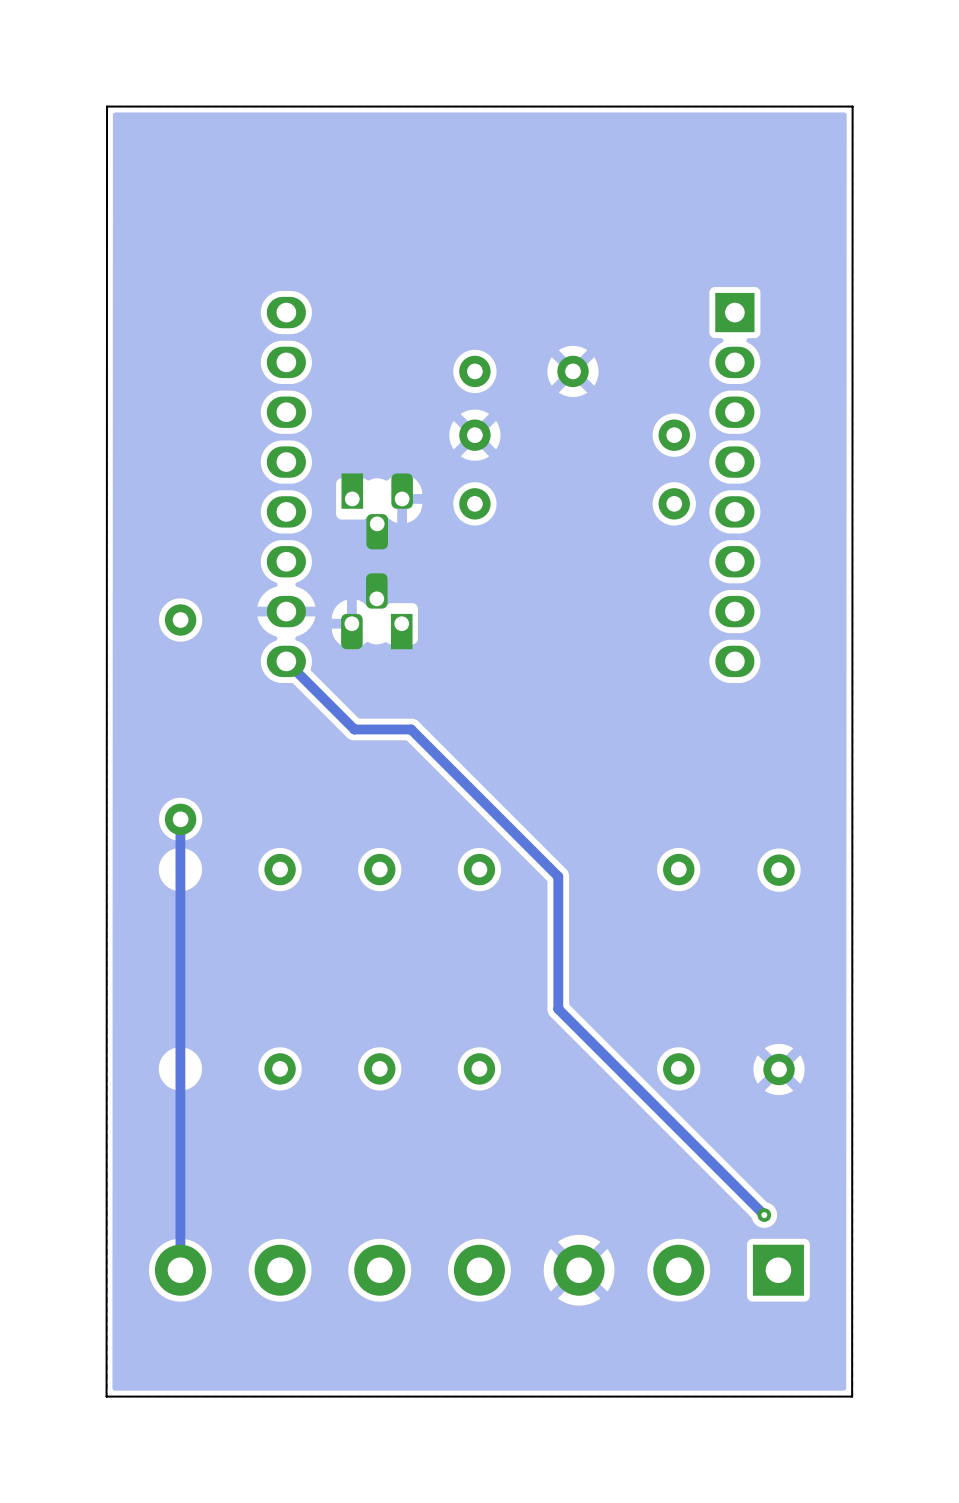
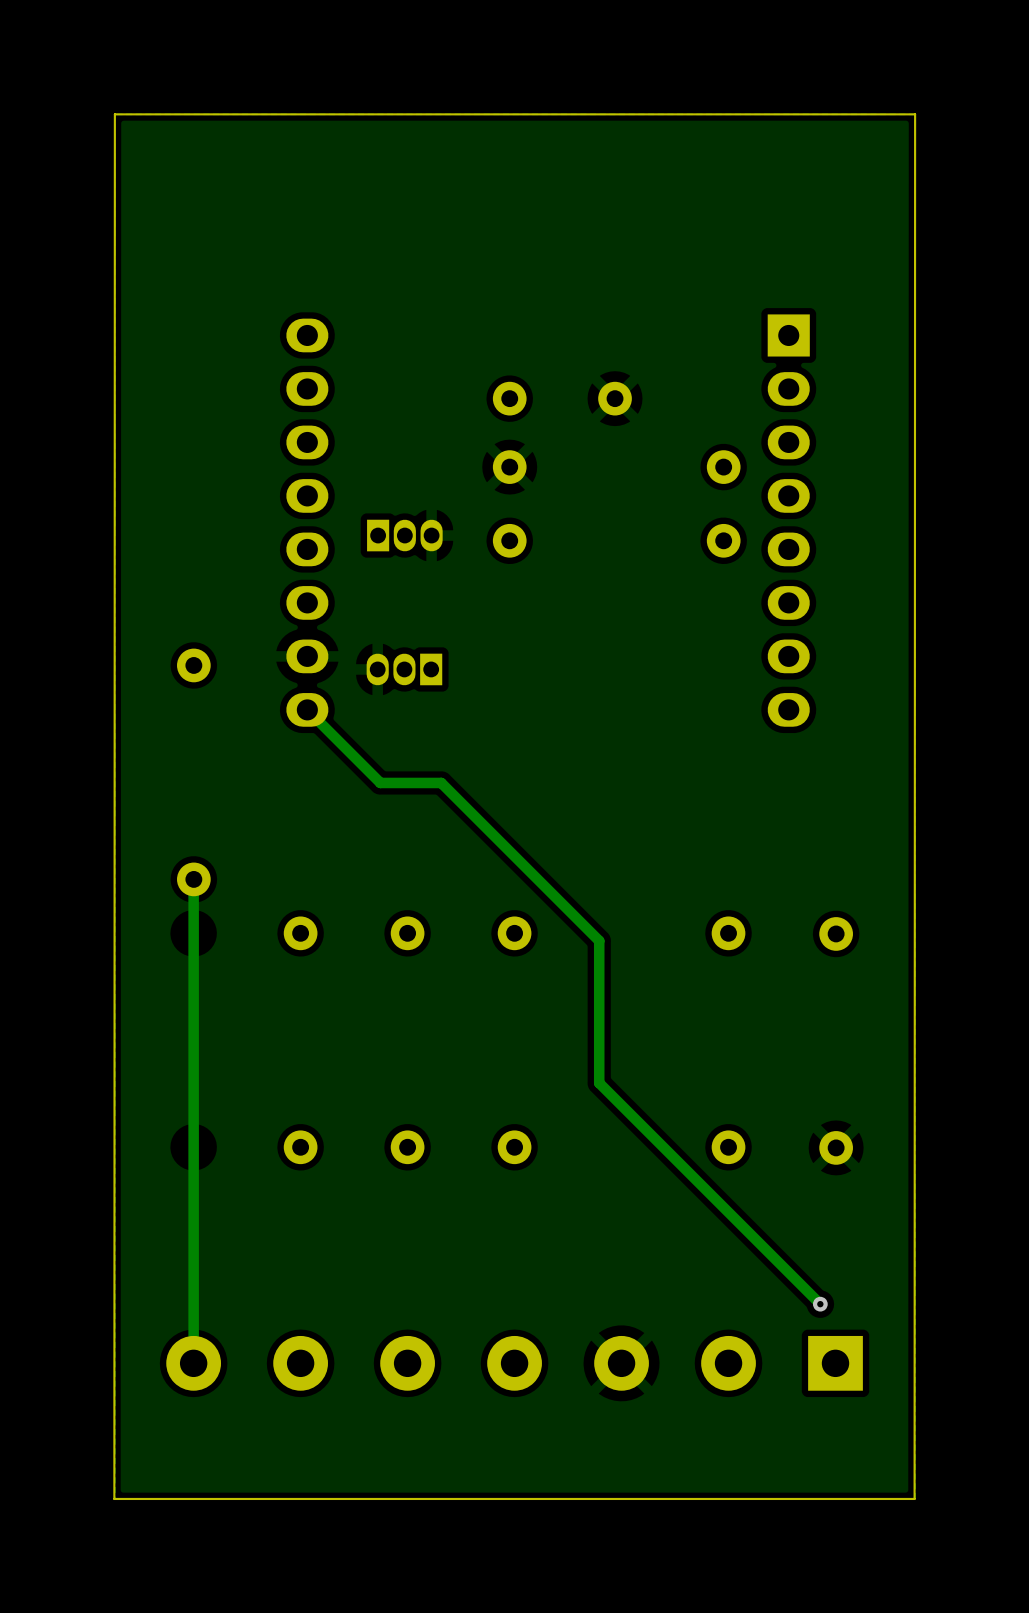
part footprint: [341, 473, 413, 550] -> [367, 519, 443, 552]
part footprint: [341, 573, 413, 650] -> [366, 653, 443, 686]

